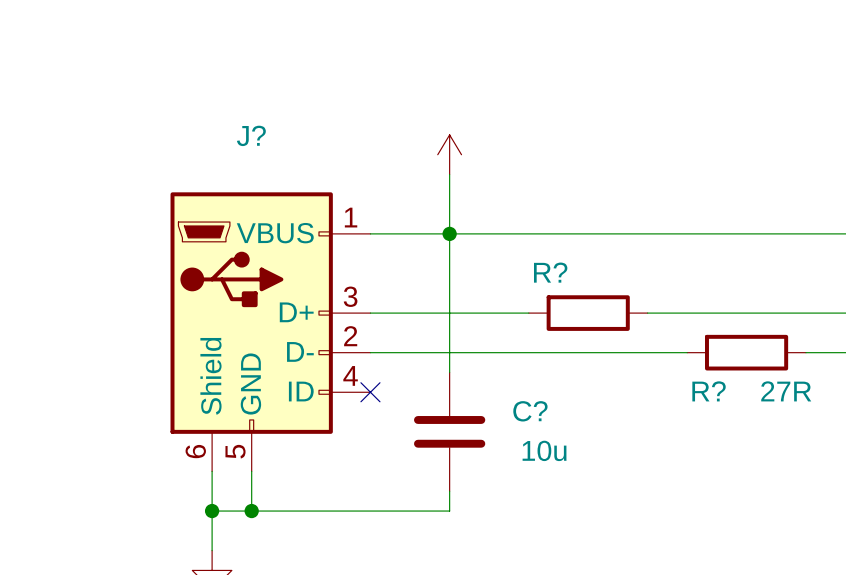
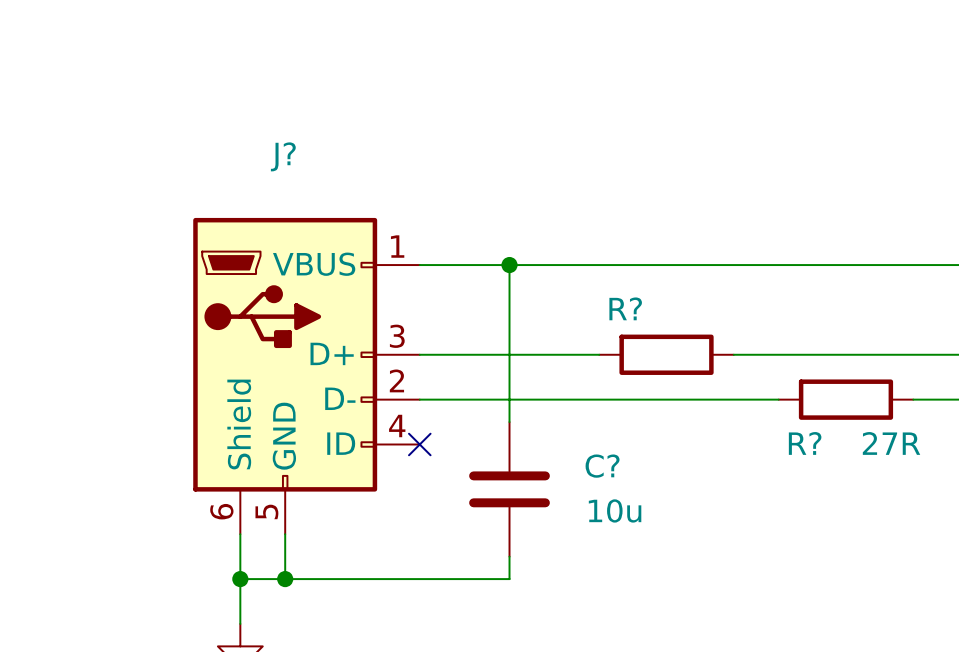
power symbol: (449, 154) -> none
wire: (449, 174) (449, 233) -> none

